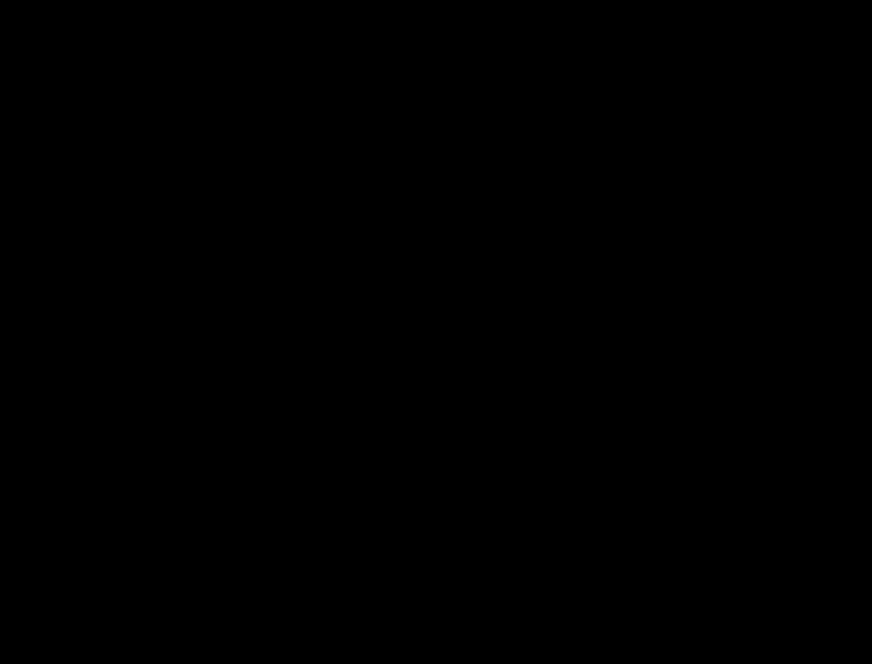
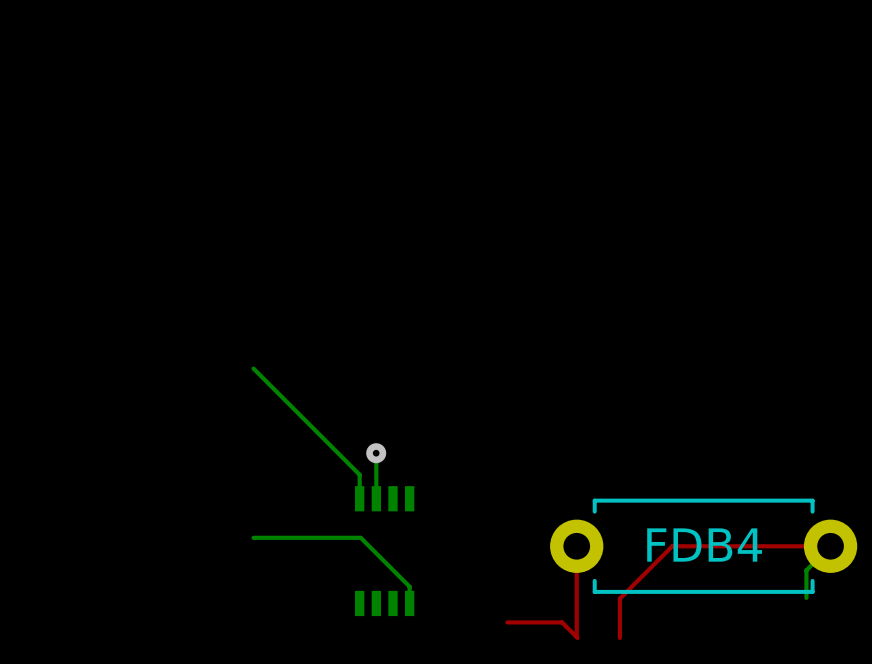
bottom track: none -> (253, 368) (359, 474) (359, 498)
bottom track: none -> (376, 453) (376, 498)
via: none -> (376, 453)
bottom track: none -> (253, 537) (360, 537) (409, 586) (409, 603)
top track: none -> (576, 546) (576, 637)
FDB4: none -> (703, 546)
top track: none -> (830, 546) (672, 546) (619, 598) (619, 637)
bottom track: none -> (830, 546) (806, 570) (806, 597)
part: none -> (384, 551)
top track: none -> (507, 622) (562, 622) (577, 637)

